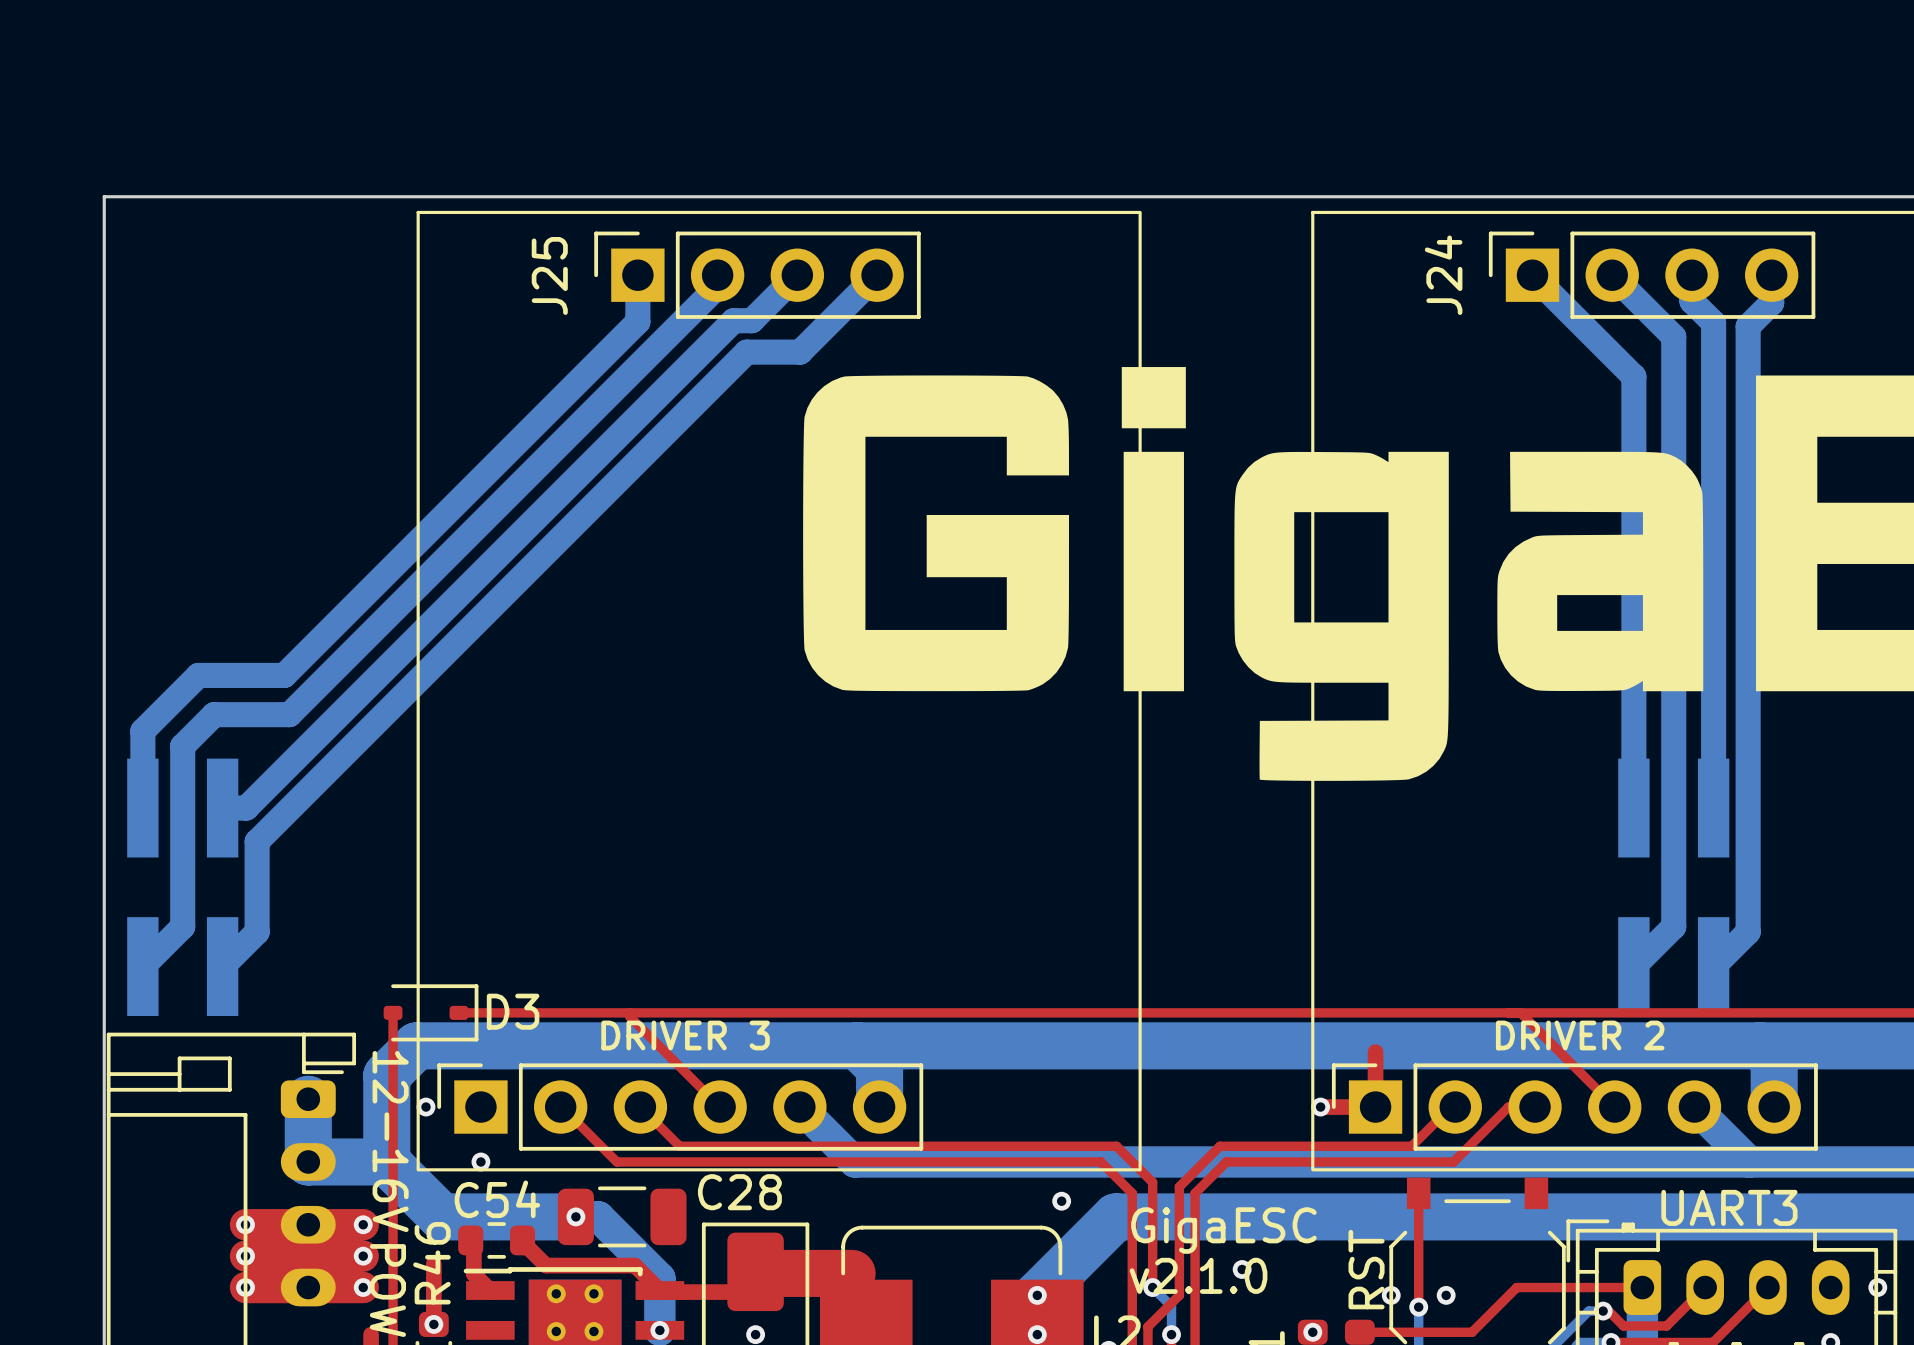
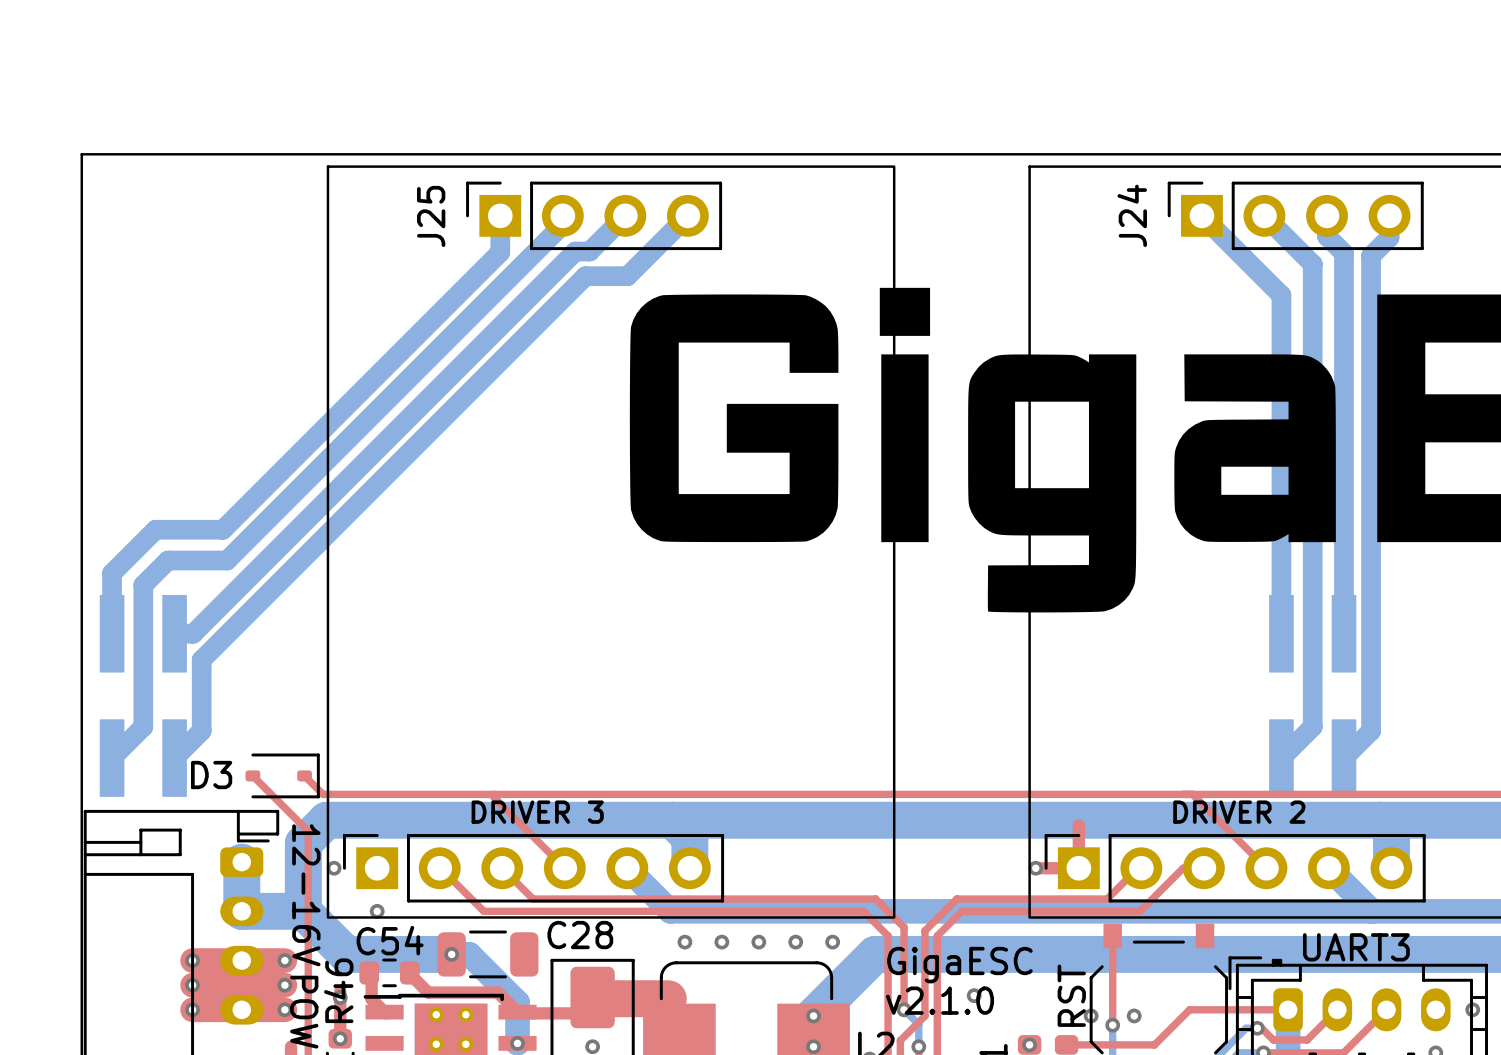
top track: none -> (304, 775) (323, 794) (359, 794)
D3 name position: D3 (513, 1011) -> D3 (211, 775)
top track: (393, 1012) (393, 1059) -> (252, 775) (308, 831)
D3 position: (431, 1012) -> (282, 775)
via: none -> (684, 942)
via: none -> (721, 942)
via: none -> (758, 942)
via: none -> (795, 942)
via: none -> (340, 997)

